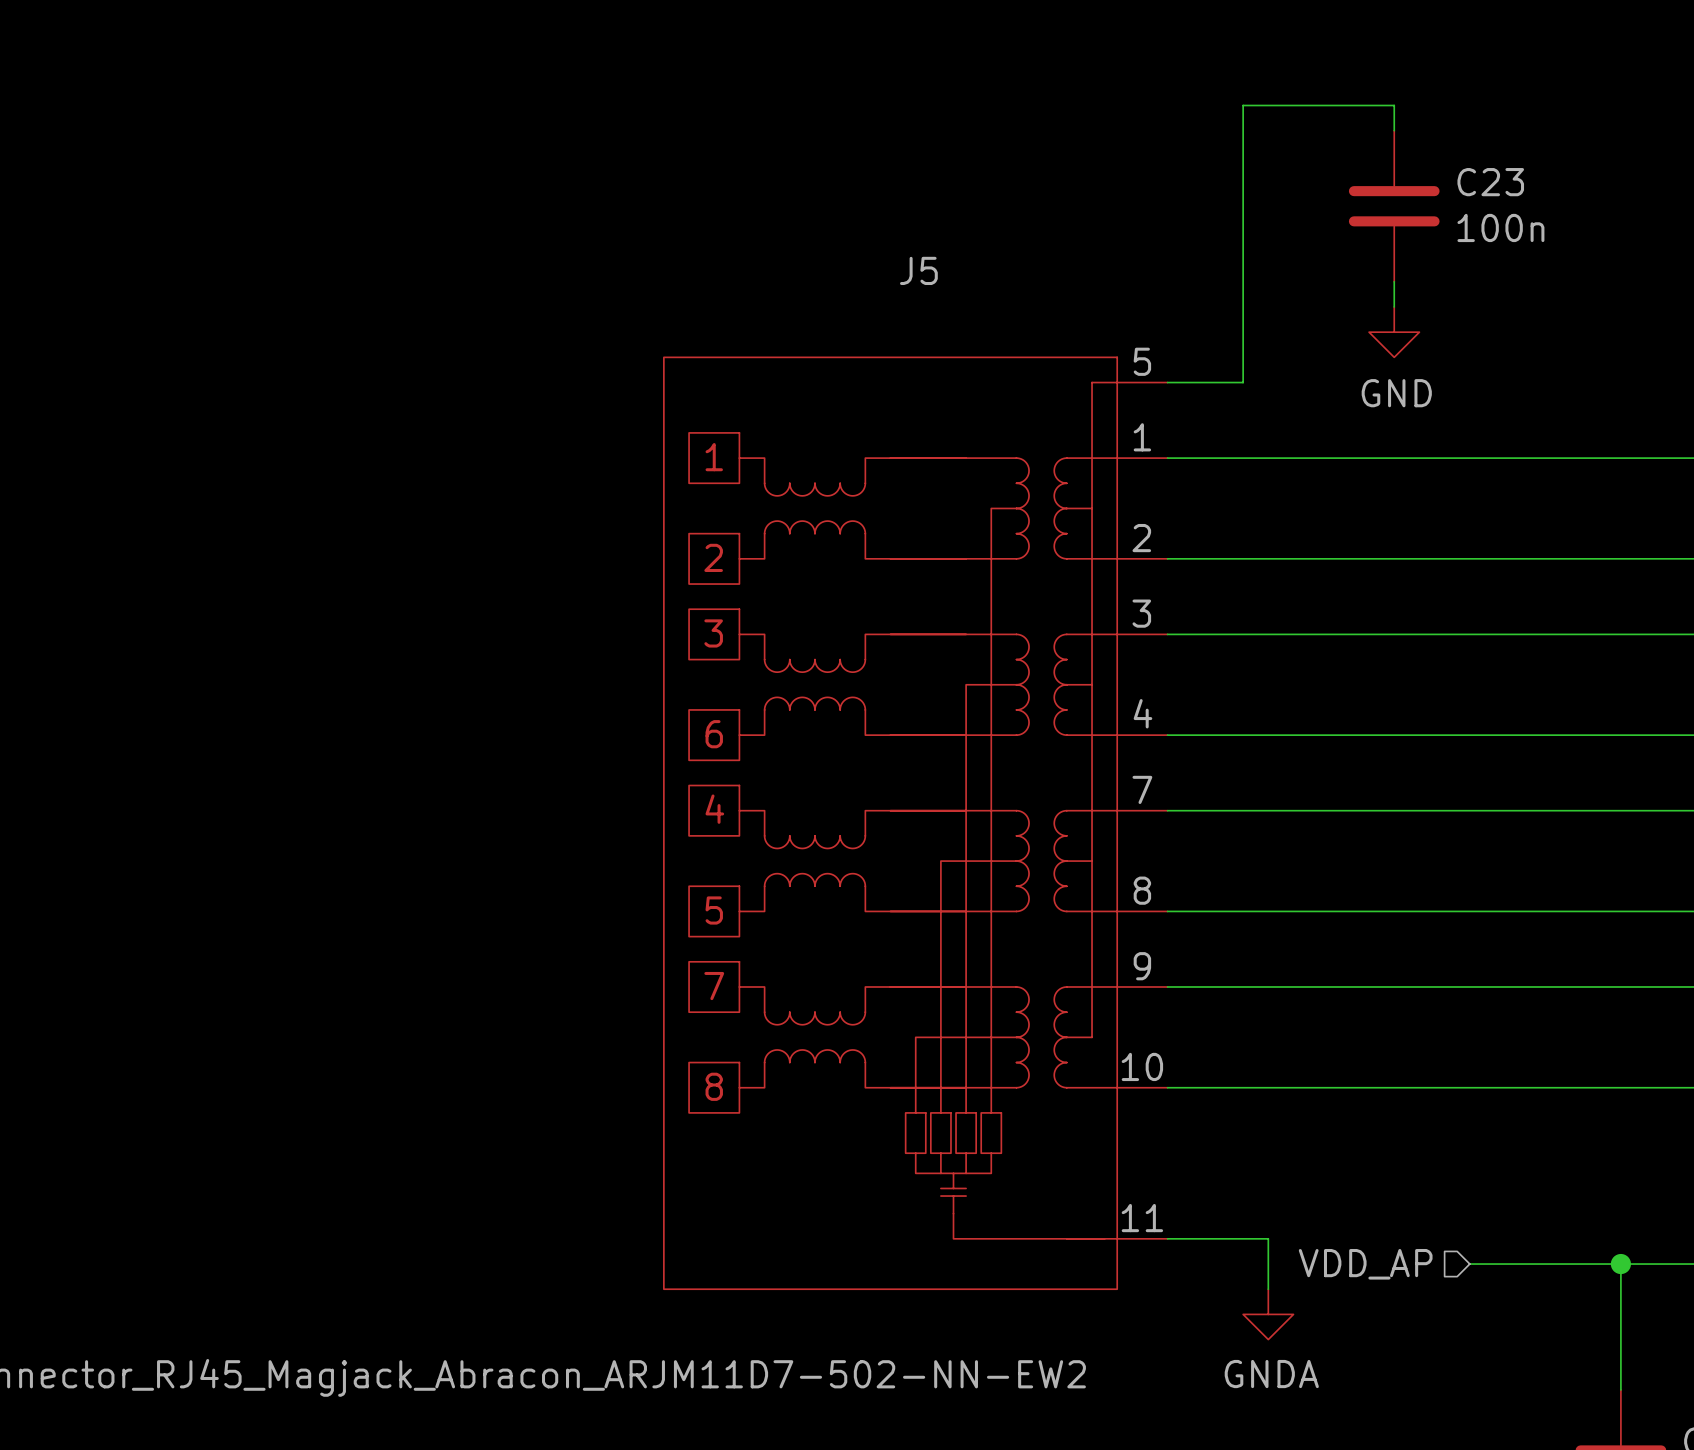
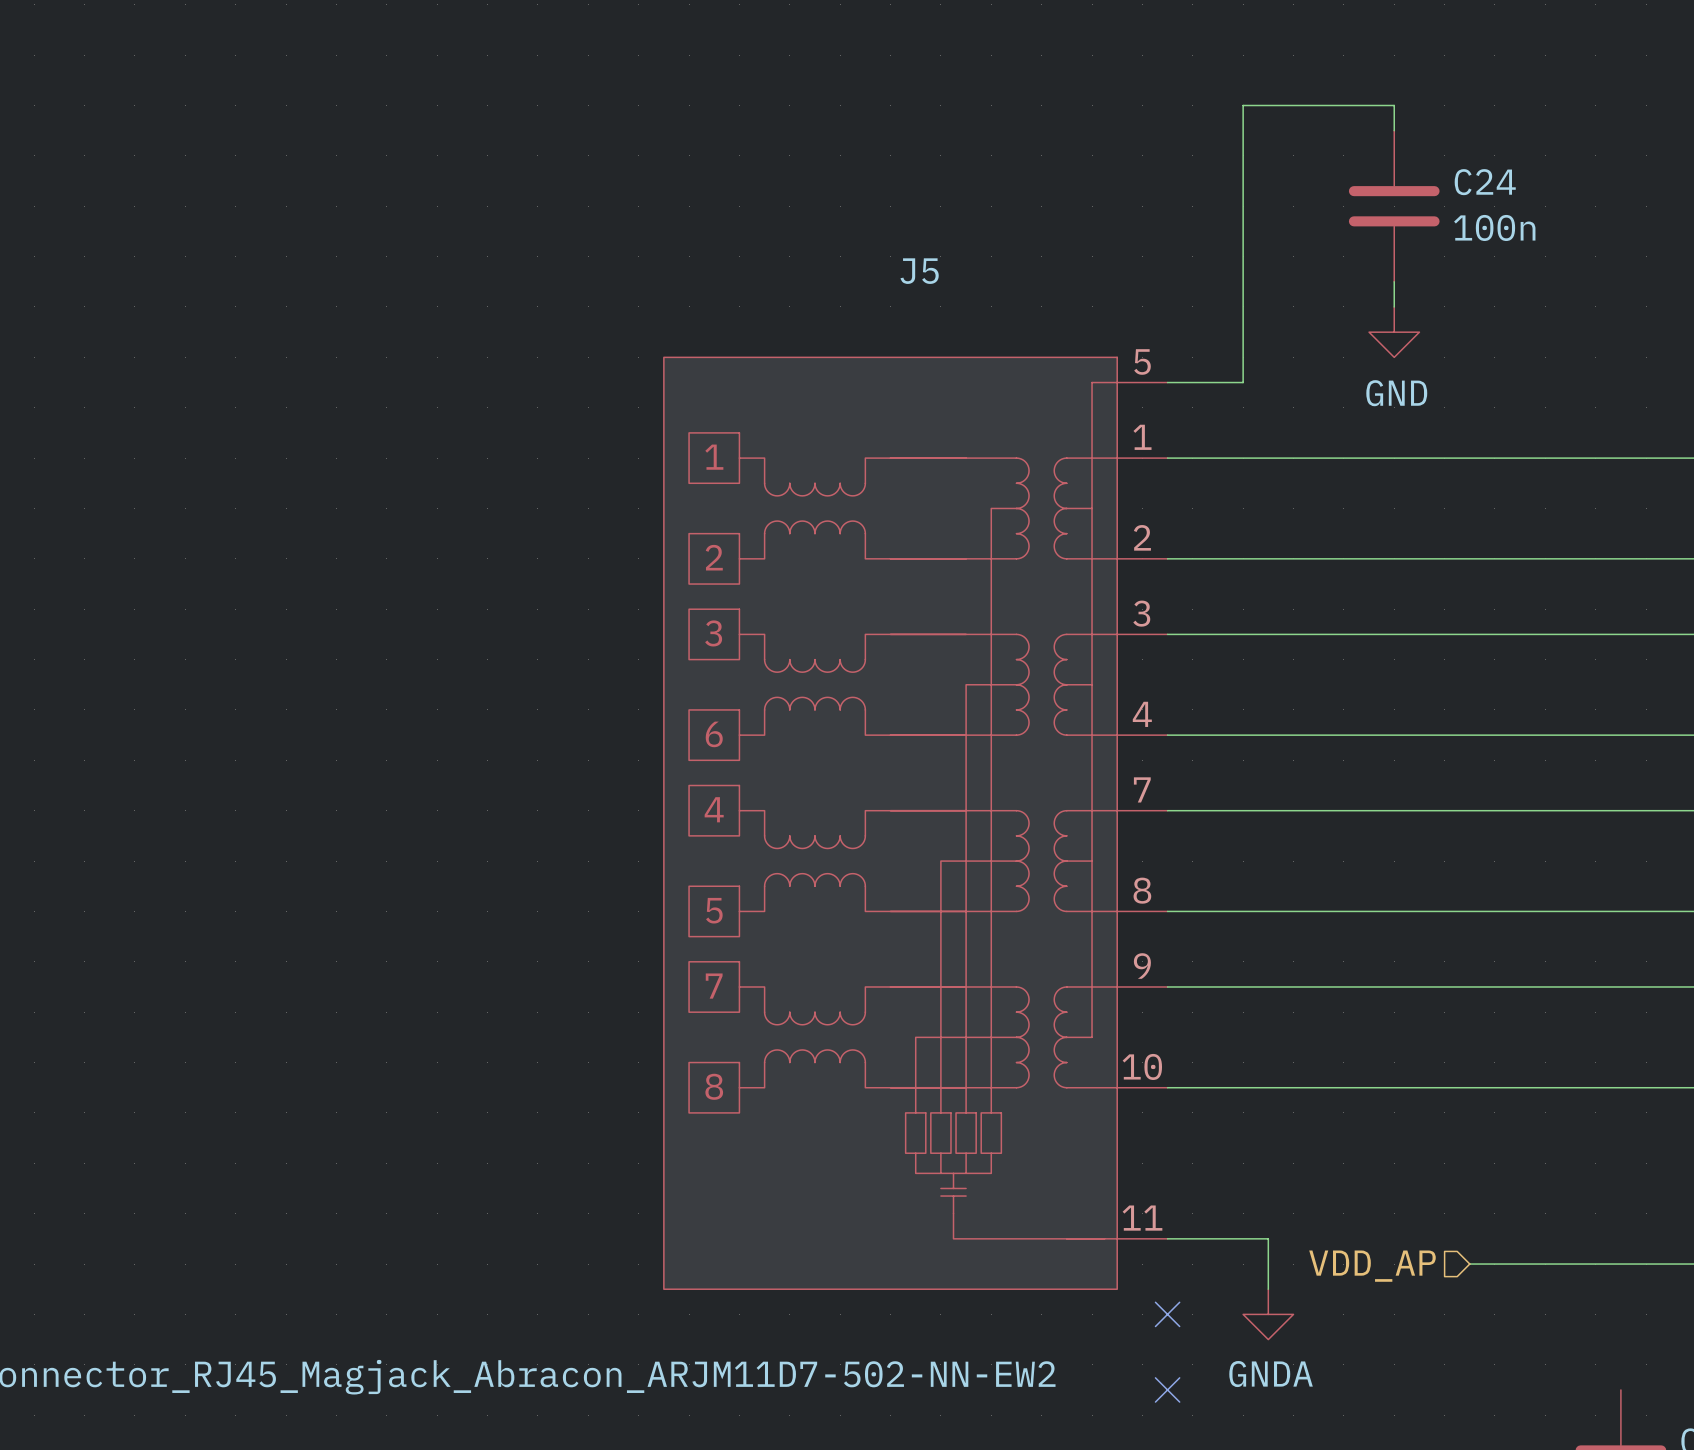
C23 name: C23 (1490, 182) -> C24 (1485, 182)
wire: (1620, 1264) (1620, 1389) -> none
junction: (1620, 1264) -> none
no-connect mark: none -> (1167, 1314)
no-connect mark: none -> (1167, 1389)

